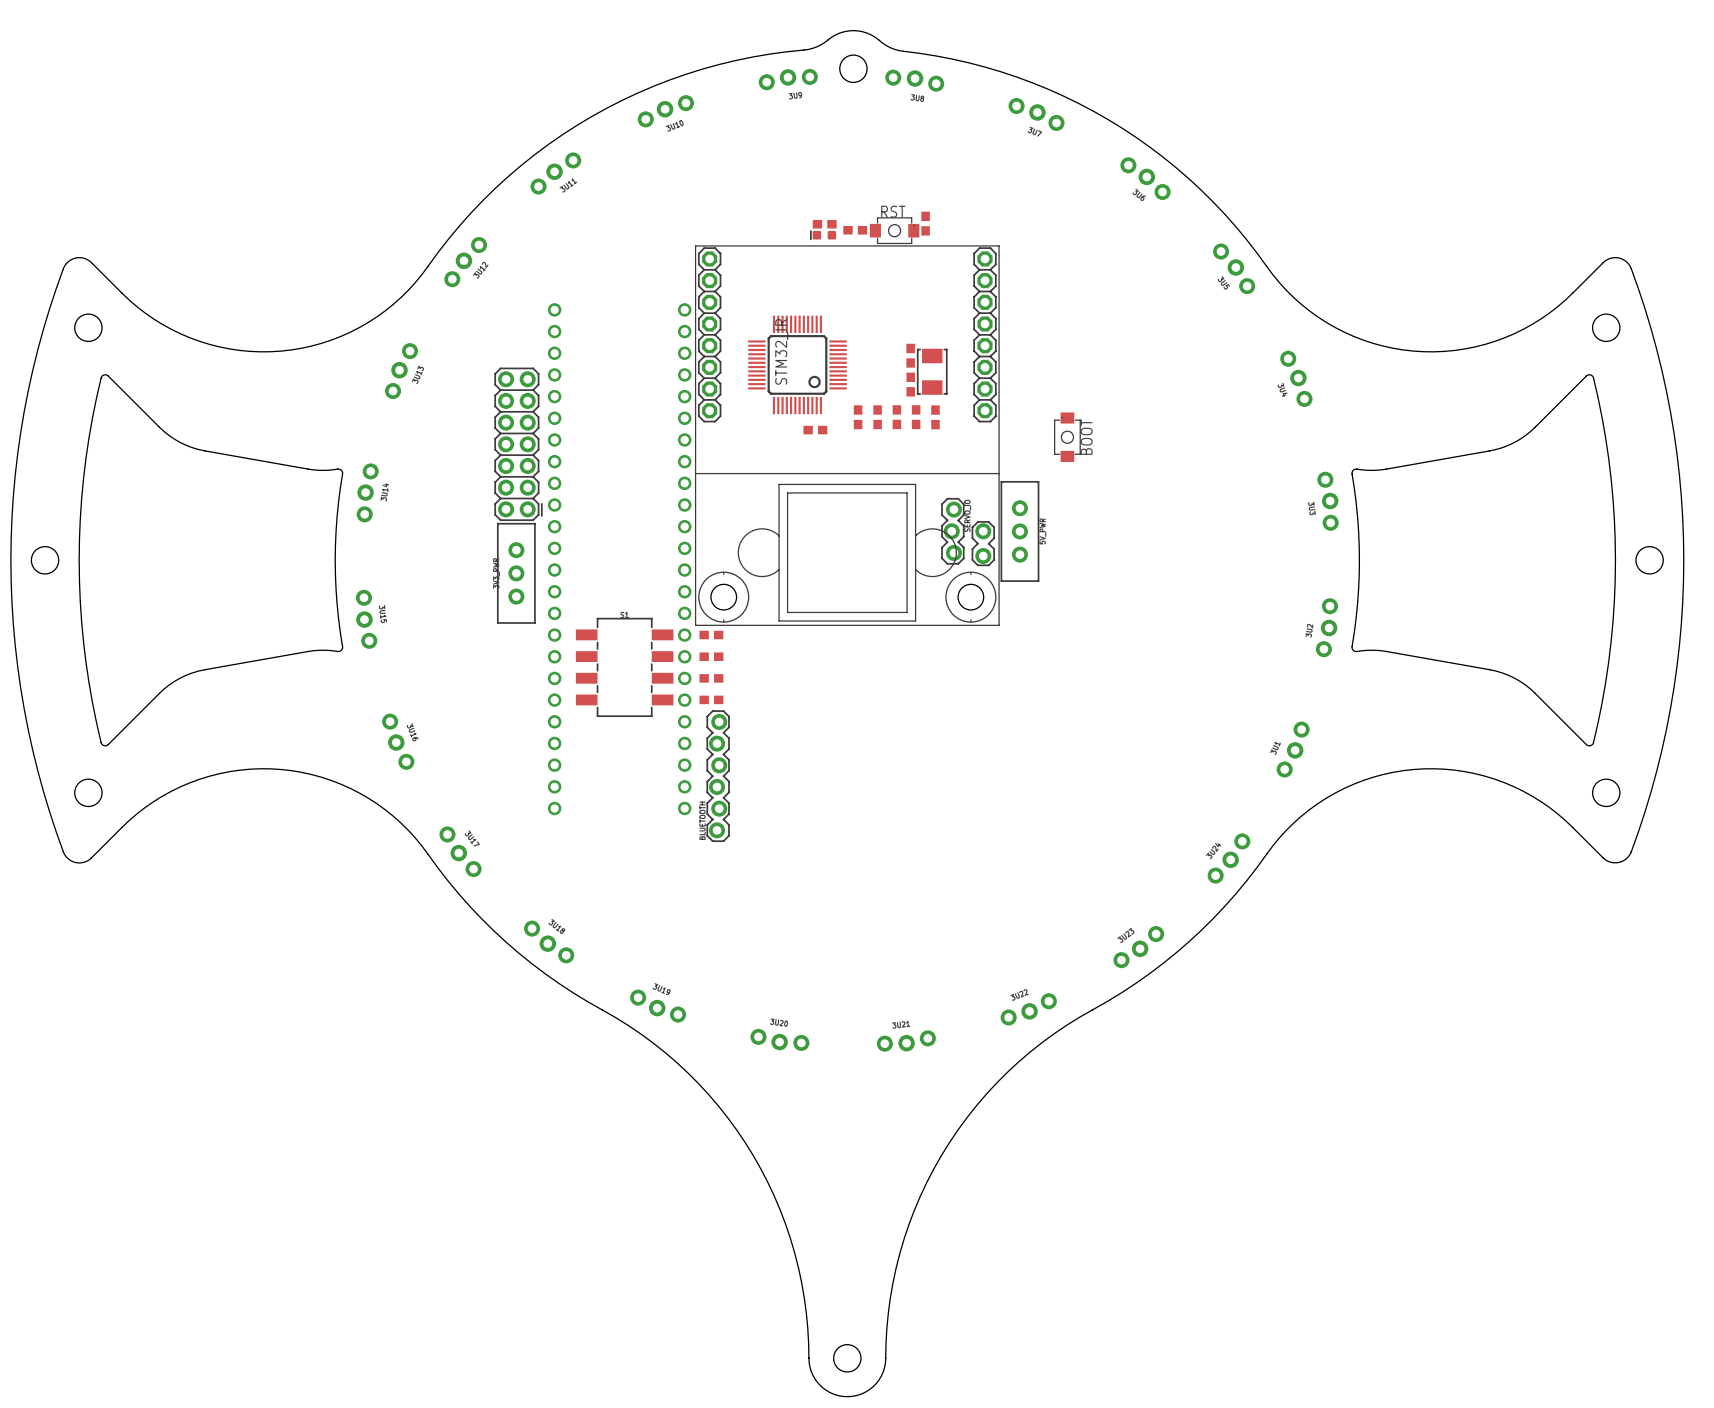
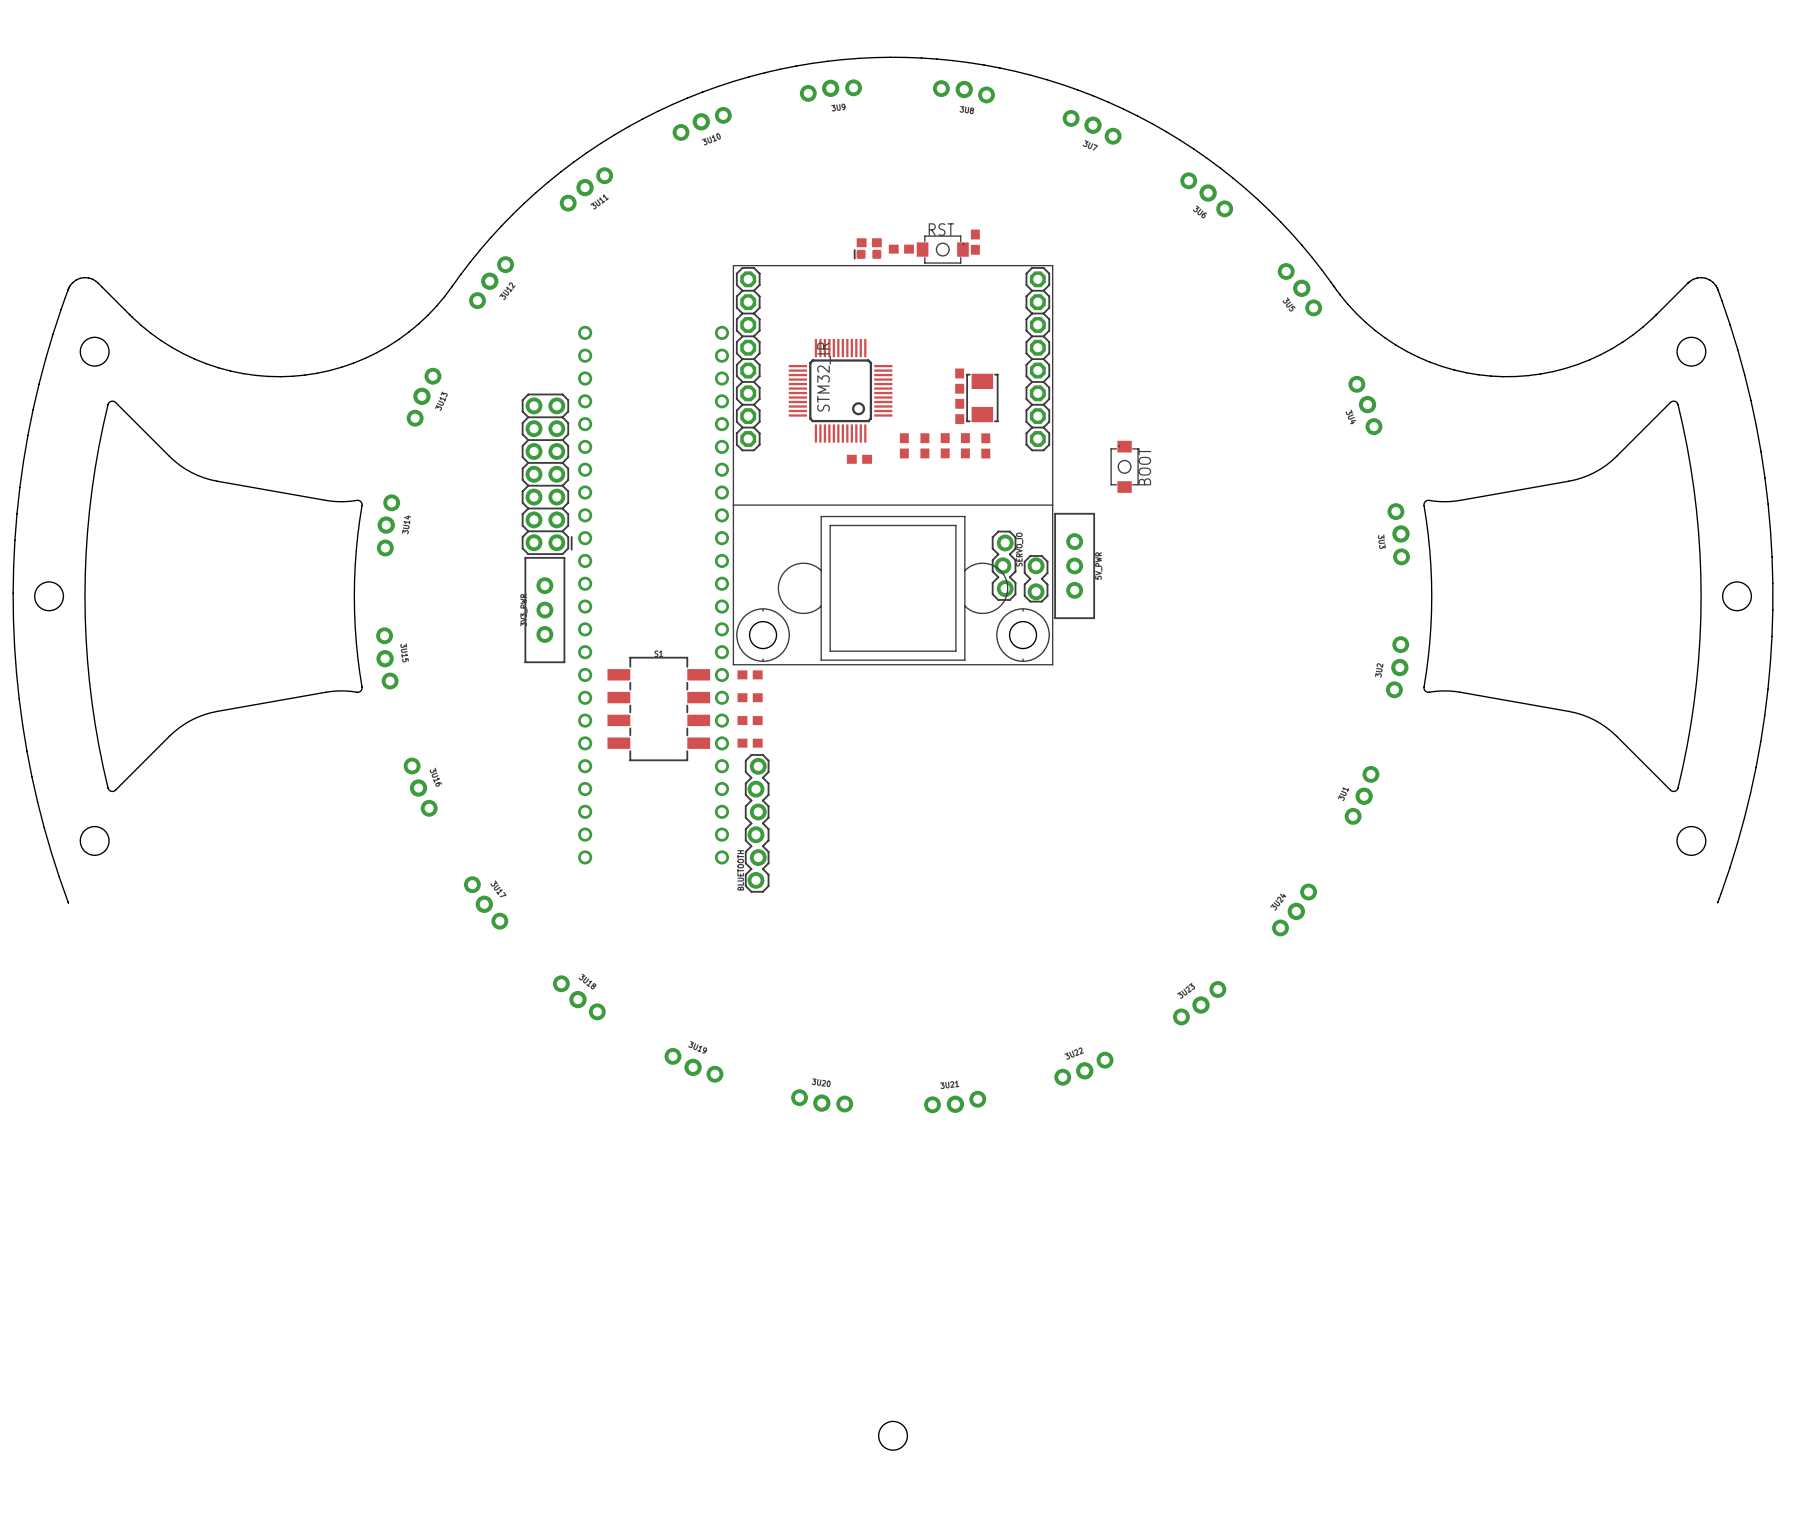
round board edge: [839, 55, 868, 83] -> none
board edge: none -> (68, 902) (44, 827) (26, 751) (16, 672) (13, 593) (16, 513) (27, 435) (45, 359) (65, 297) (72, 282) (84, 277) (92, 279) (150, 333) (182, 353) (206, 363) (230, 371) (268, 376) (305, 375) (329, 370) (353, 363) (376, 352) (409, 331) (436, 306) (480, 249) (524, 203) (573, 162) (628, 126) (687, 98) (749, 76) (811, 63) (890, 57) (968, 62) (1031, 75) (1092, 95) (1152, 123) (1207, 158) (1257, 199) (1301, 245) (1347, 304) (1375, 330) (1407, 351) (1430, 362) (1454, 370) (1478, 374) (1515, 376) (1553, 371) (1577, 364) (1601, 354) (1633, 334) (1693, 279) (1701, 277) (1713, 282) (1719, 294) (1737, 349) (1756, 425) (1768, 504) (1772, 583) (1770, 662) (1760, 741) (1744, 818) (1717, 902)
board edge: (808, 1358) (804, 1297) (790, 1238) (774, 1196) (760, 1168) (727, 1117) (698, 1083) (652, 1042) (628, 1025) (559, 983) (506, 942) (458, 894) (408, 830) (377, 803) (340, 784) (311, 774) (270, 768) (229, 771) (190, 782) (153, 801) (129, 820) (86, 861) (75, 862) (65, 855) (43, 791) (24, 708) (13, 624) (10, 560) (13, 496) (24, 412) (43, 329) (65, 264) (75, 258) (88, 260) (145, 313) (180, 333) (209, 344) (240, 350) (270, 351) (291, 349) (321, 343) (359, 327) (393, 304) (415, 282) (459, 225) (495, 188) (548, 144) (591, 116) (637, 92) (686, 74) (752, 57) (812, 48) (836, 34) (853, 30) (871, 35) (894, 49) (952, 59) (1017, 77) (1063, 96) (1108, 119) (1150, 147) (1201, 190) (1235, 226) (1279, 282) (1301, 304) (1335, 327) (1373, 343) (1403, 349) (1434, 351) (1464, 348) (1494, 341) (1523, 329) (1549, 313) (1606, 260) (1614, 257) (1624, 260) (1631, 268) (1645, 308) (1666, 391) (1679, 475) (1683, 560) (1681, 624) (1670, 708) (1651, 791) (1629, 855) (1618, 862) (1606, 860) (1565, 820) (1540, 801) (1504, 782) (1464, 771) (1423, 768) (1393, 772) (1353, 784) (1326, 798) (1301, 816) (1286, 830) (1235, 894) (1188, 942) (1135, 983) (1066, 1025) (1041, 1042) (996, 1083) (966, 1117) (933, 1168) (909, 1224) (896, 1267) (890, 1297) (884, 1367) (876, 1383) (865, 1392) (856, 1395) (847, 1396) (833, 1394) (821, 1387) (815, 1380) (811, 1371) (808, 1358) -> none

